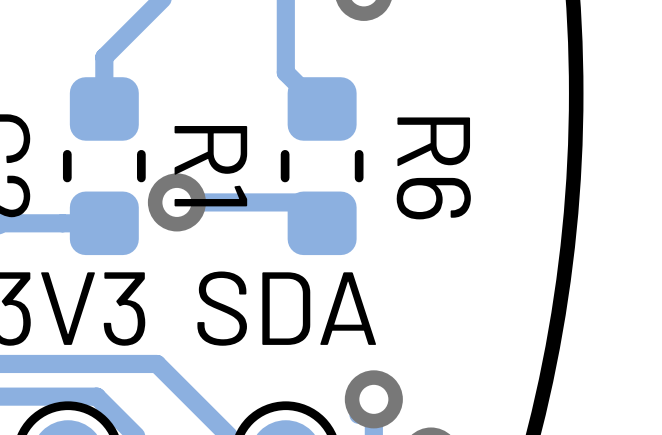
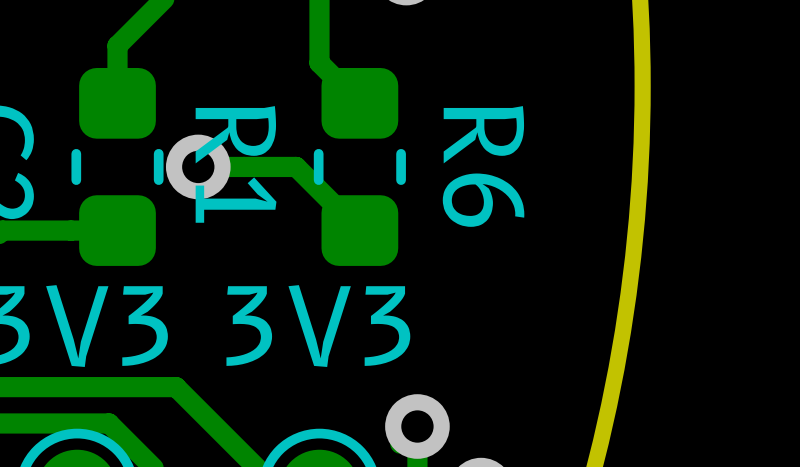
via position: (176, 202) -> (198, 166)
track: (301, 202) (176, 202) -> (336, 207) (296, 166) (198, 166)
part value: SDA (286, 308) -> 3V3 (318, 326)

